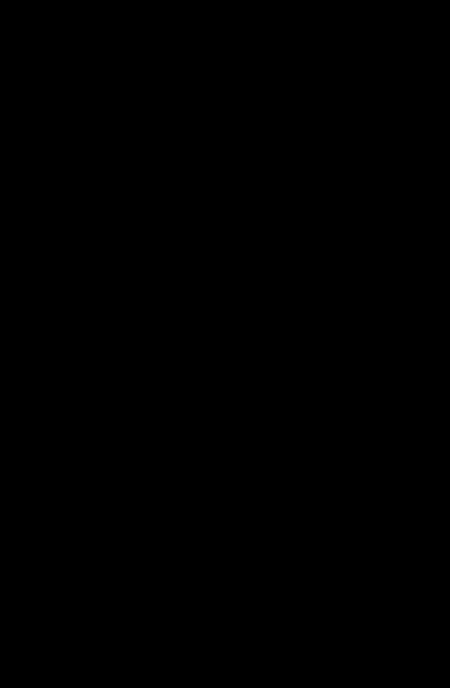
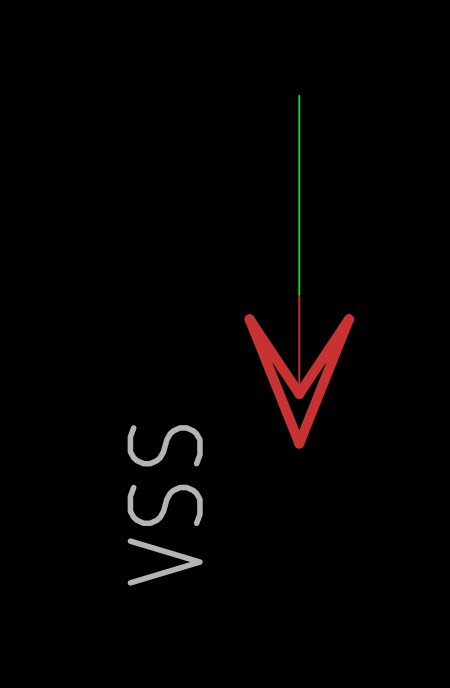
wire: none -> (299, 95) (299, 294)
power symbol: none -> VSS (299, 371)

